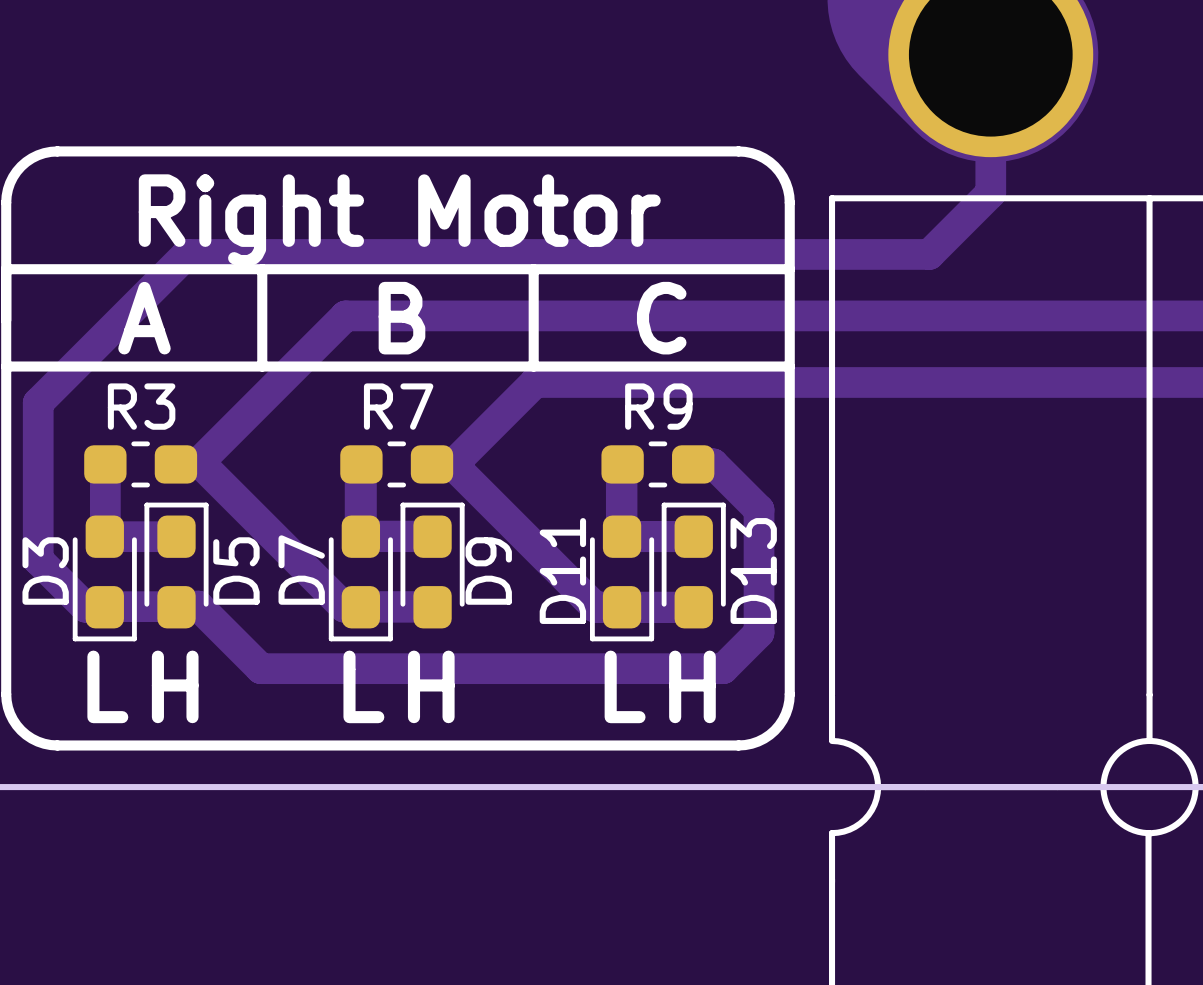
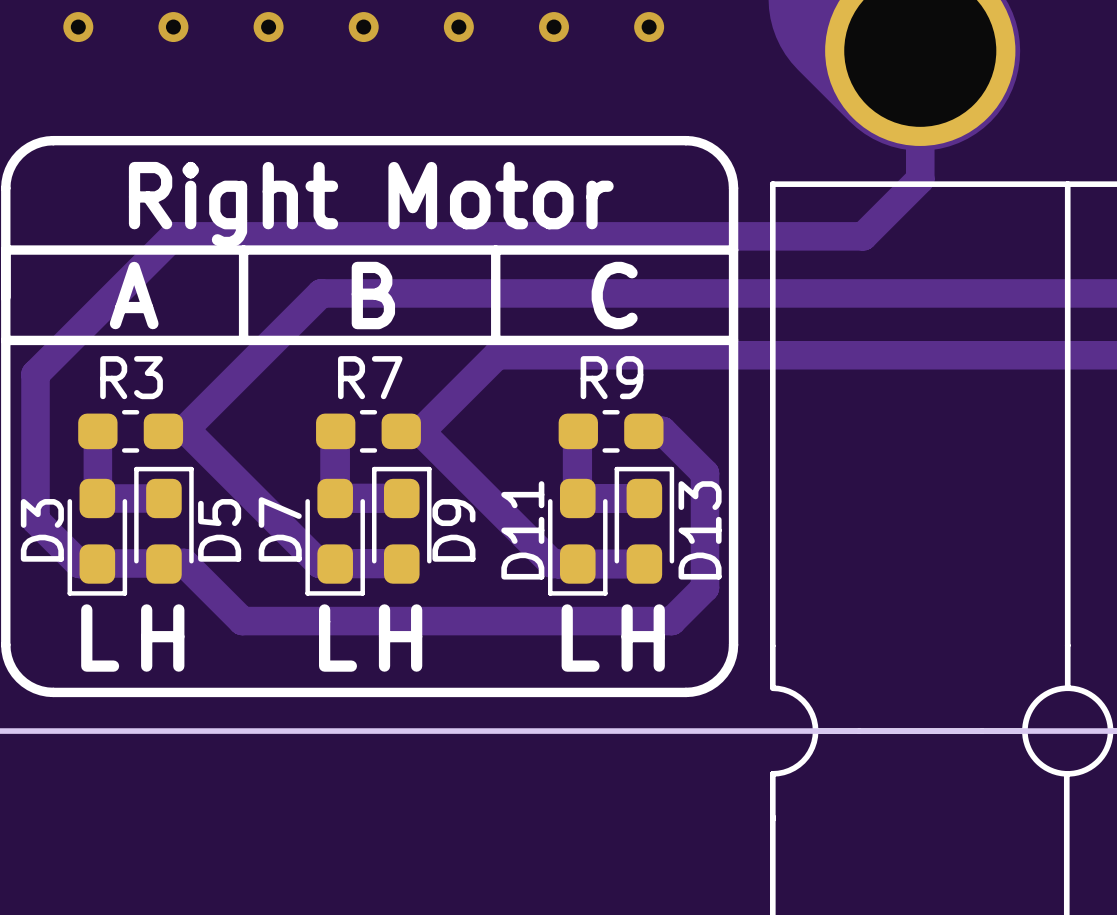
via: none -> (78, 27)
via: none -> (173, 27)
via: none -> (268, 27)
via: none -> (363, 27)
via: none -> (458, 27)
via: none -> (553, 27)
via: none -> (649, 27)

